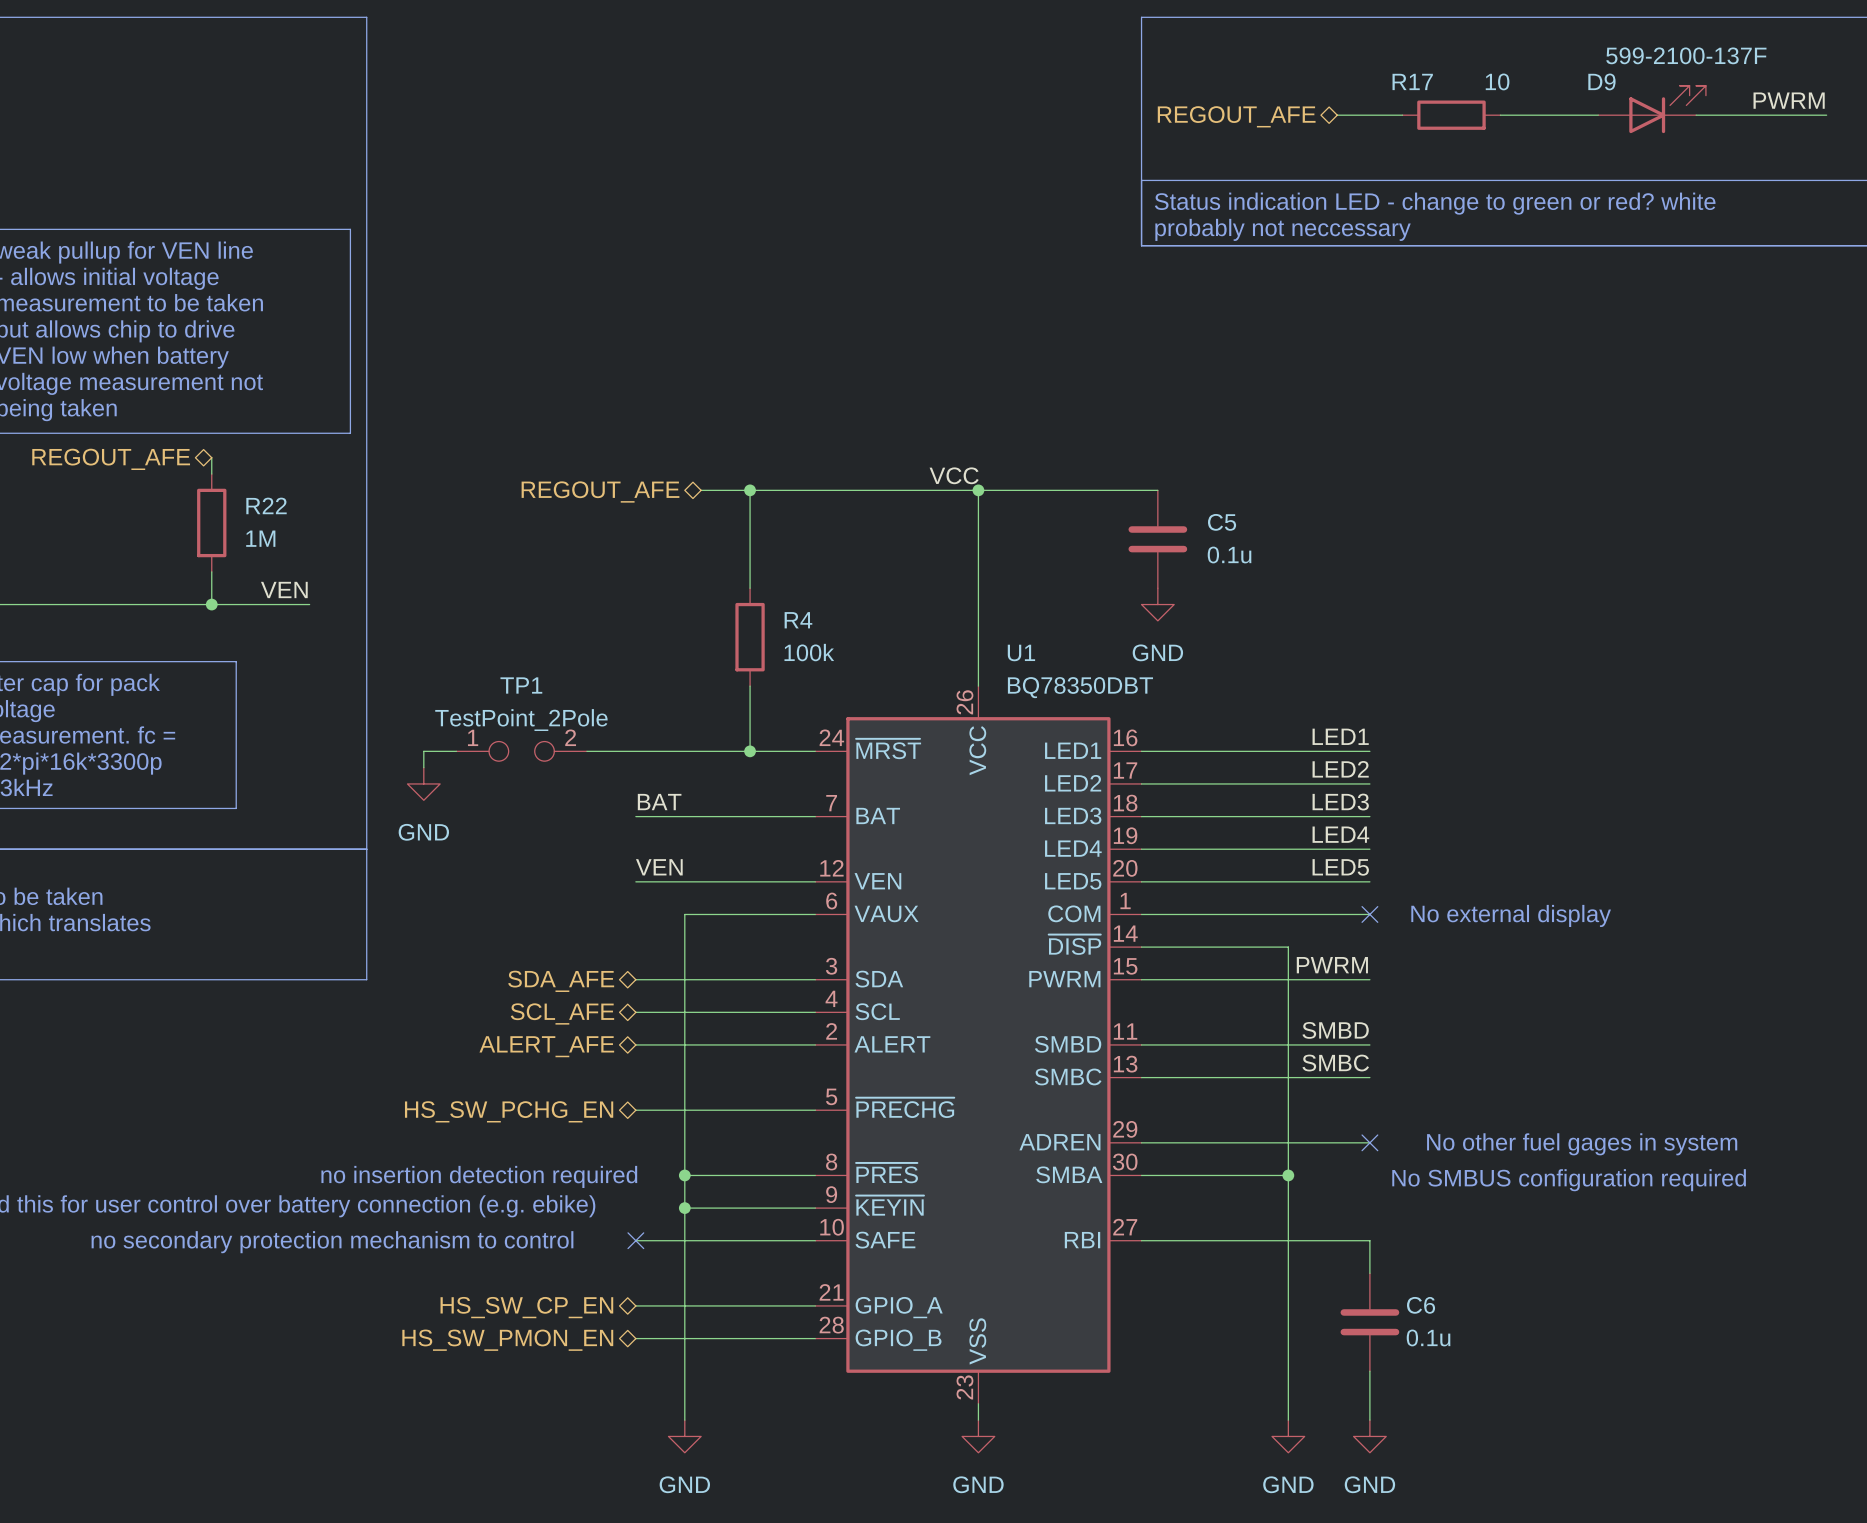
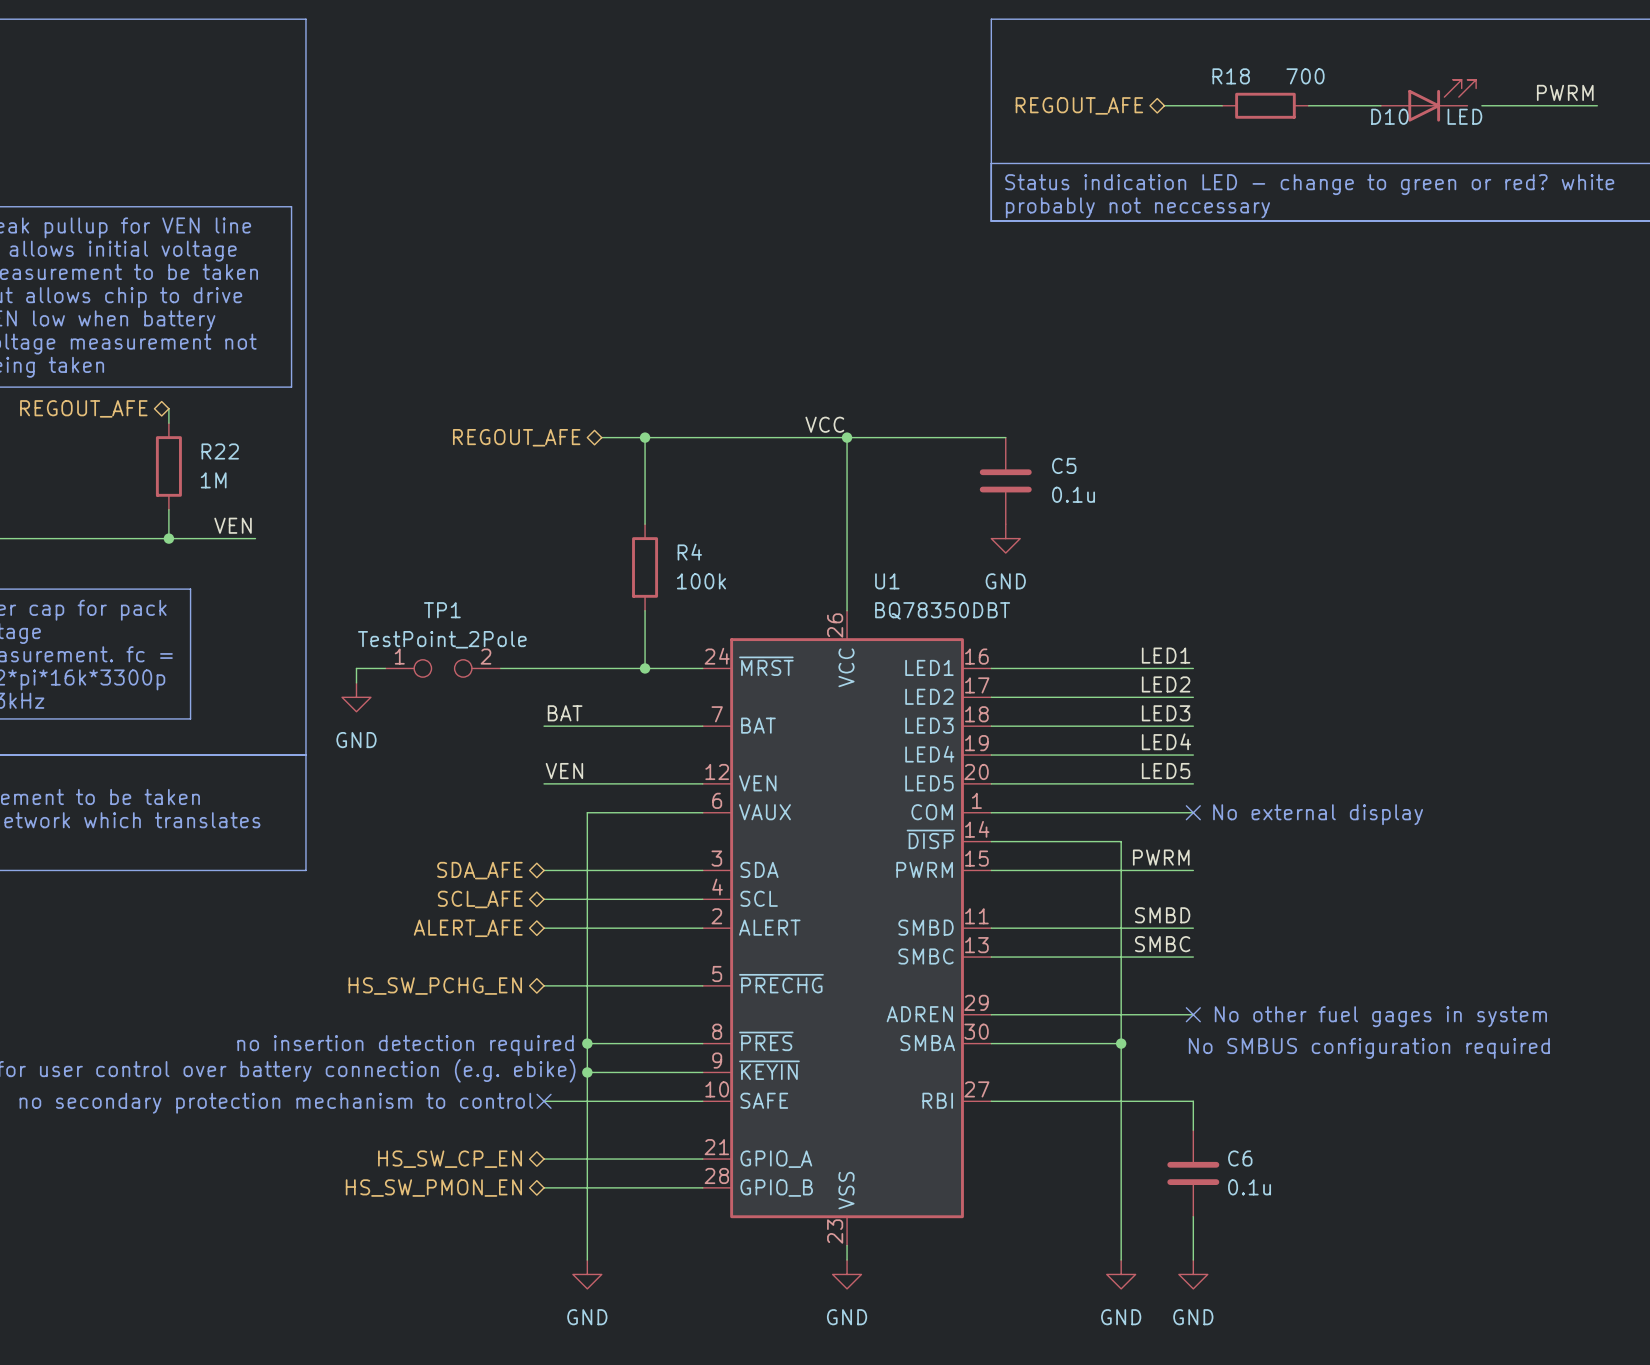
R17 name: R17 (1412, 81) -> R18 (1231, 76)
R17 value: 10 (1497, 81) -> 700 (1305, 76)
D10: none -> LED (1428, 100)
D9: 599-2100-137F (1652, 109) -> none

